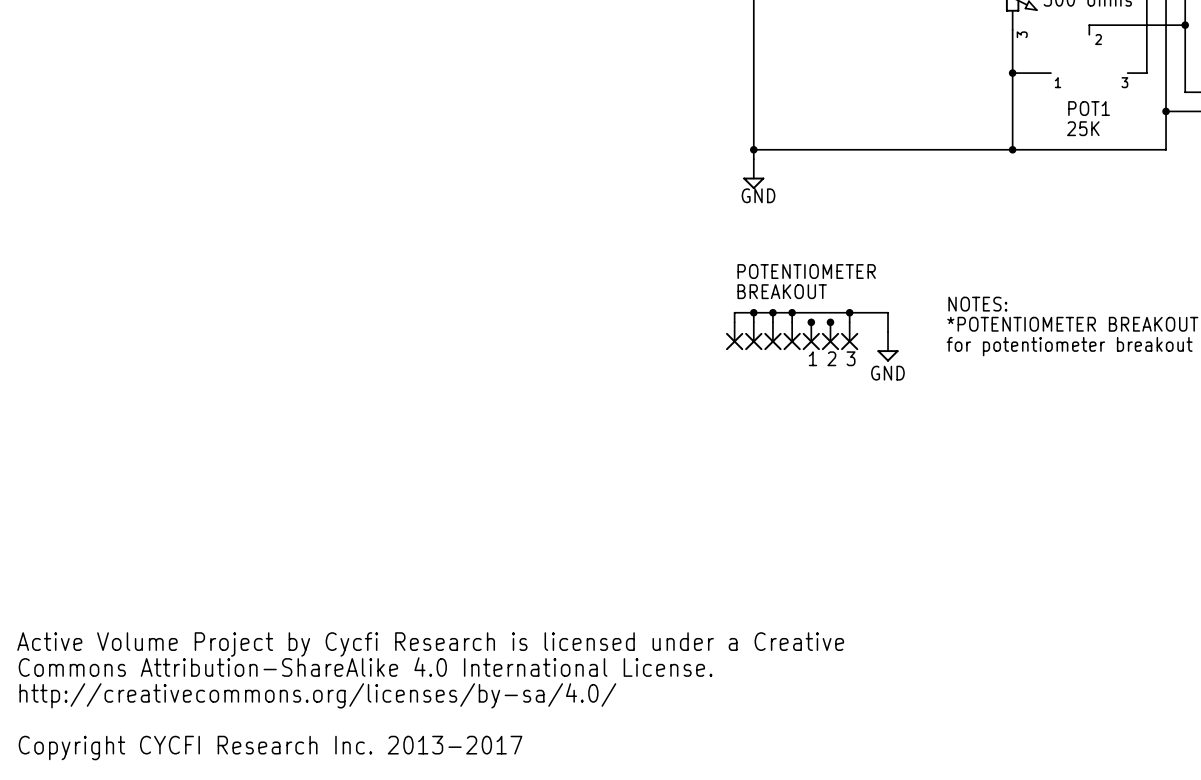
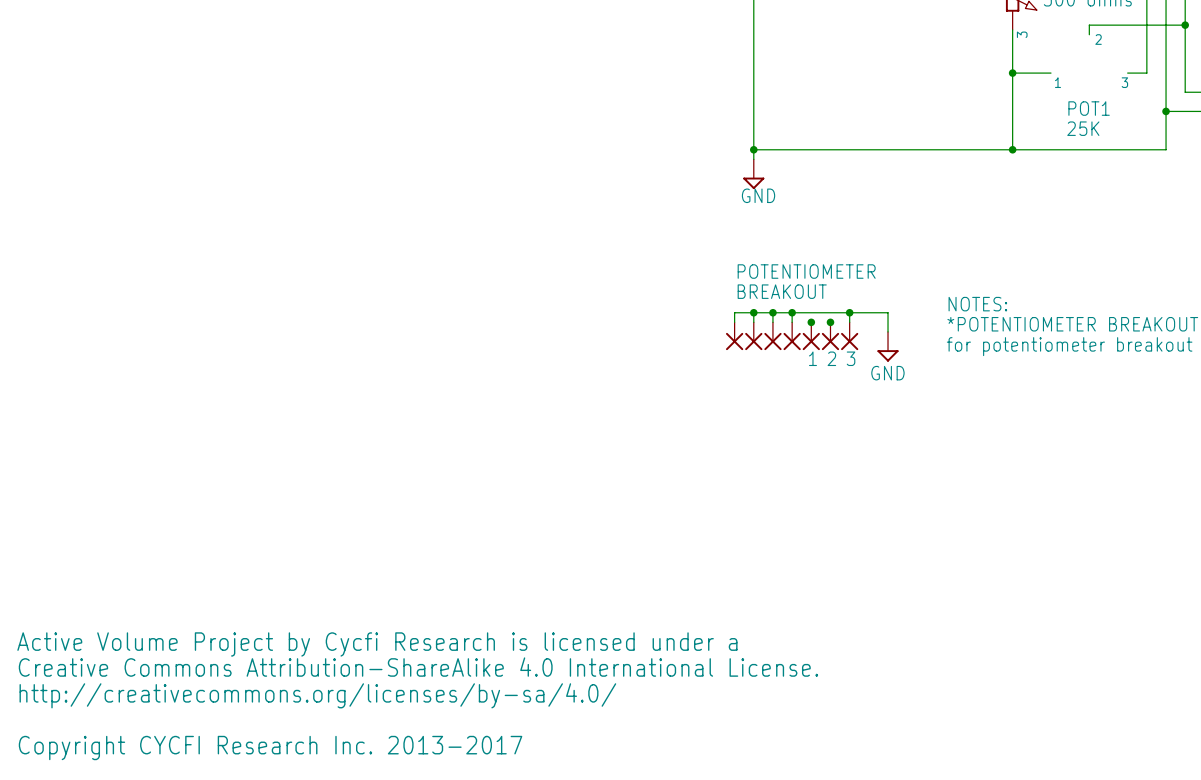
text: Active Volume Project by Cycfi Research is licensed under a Creative (430, 644) -> Active Volume Project by Cycfi Research is licensed under a (377, 644)
text: Commons Attribution-ShareAlike 4.0 International License. (365, 667) -> Creative Commons Attribution-ShareAlike 4.0 International License. (418, 667)

